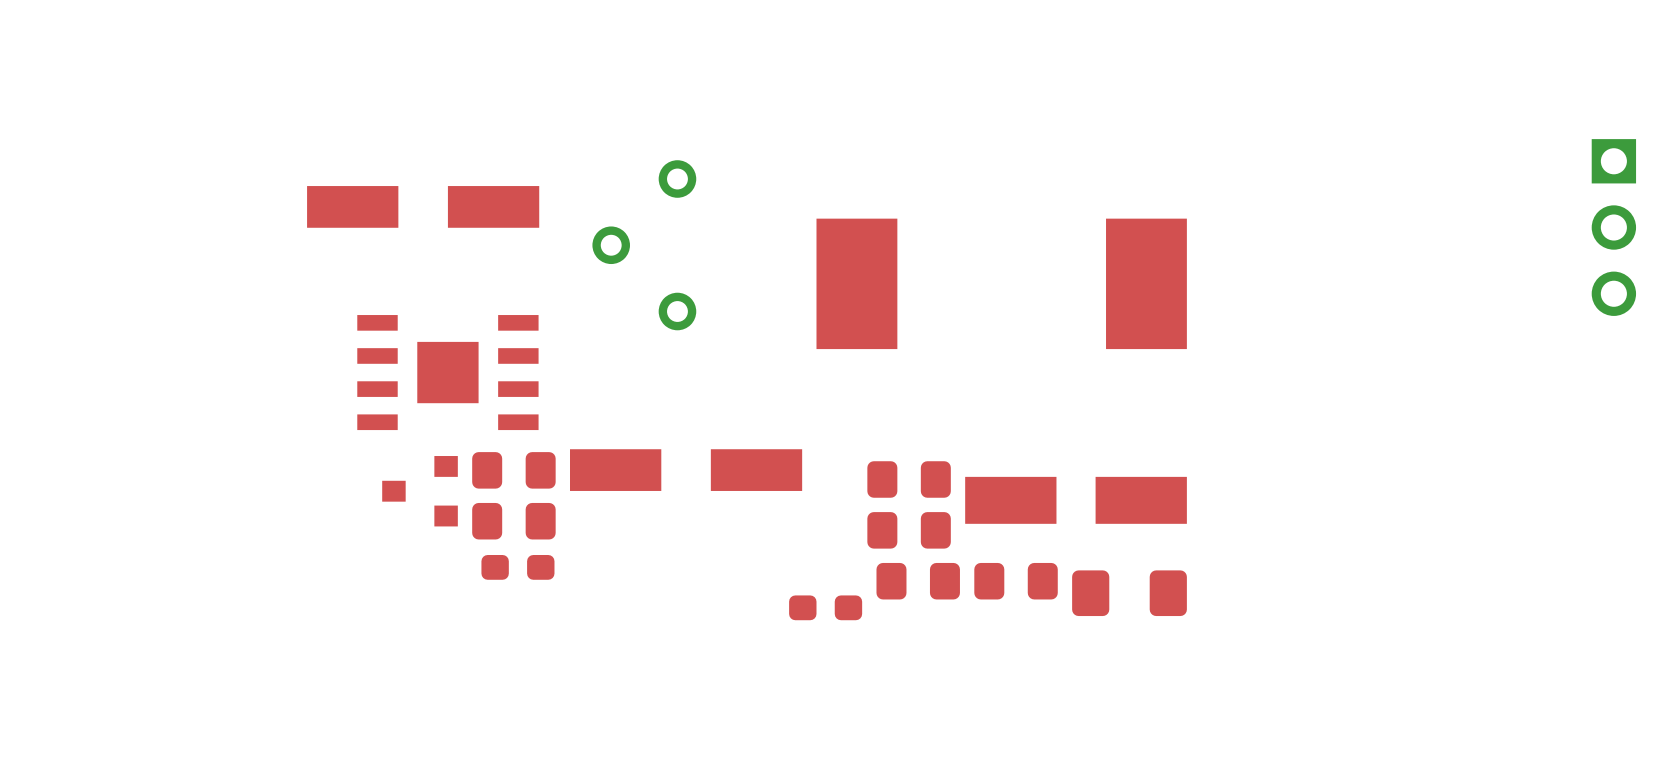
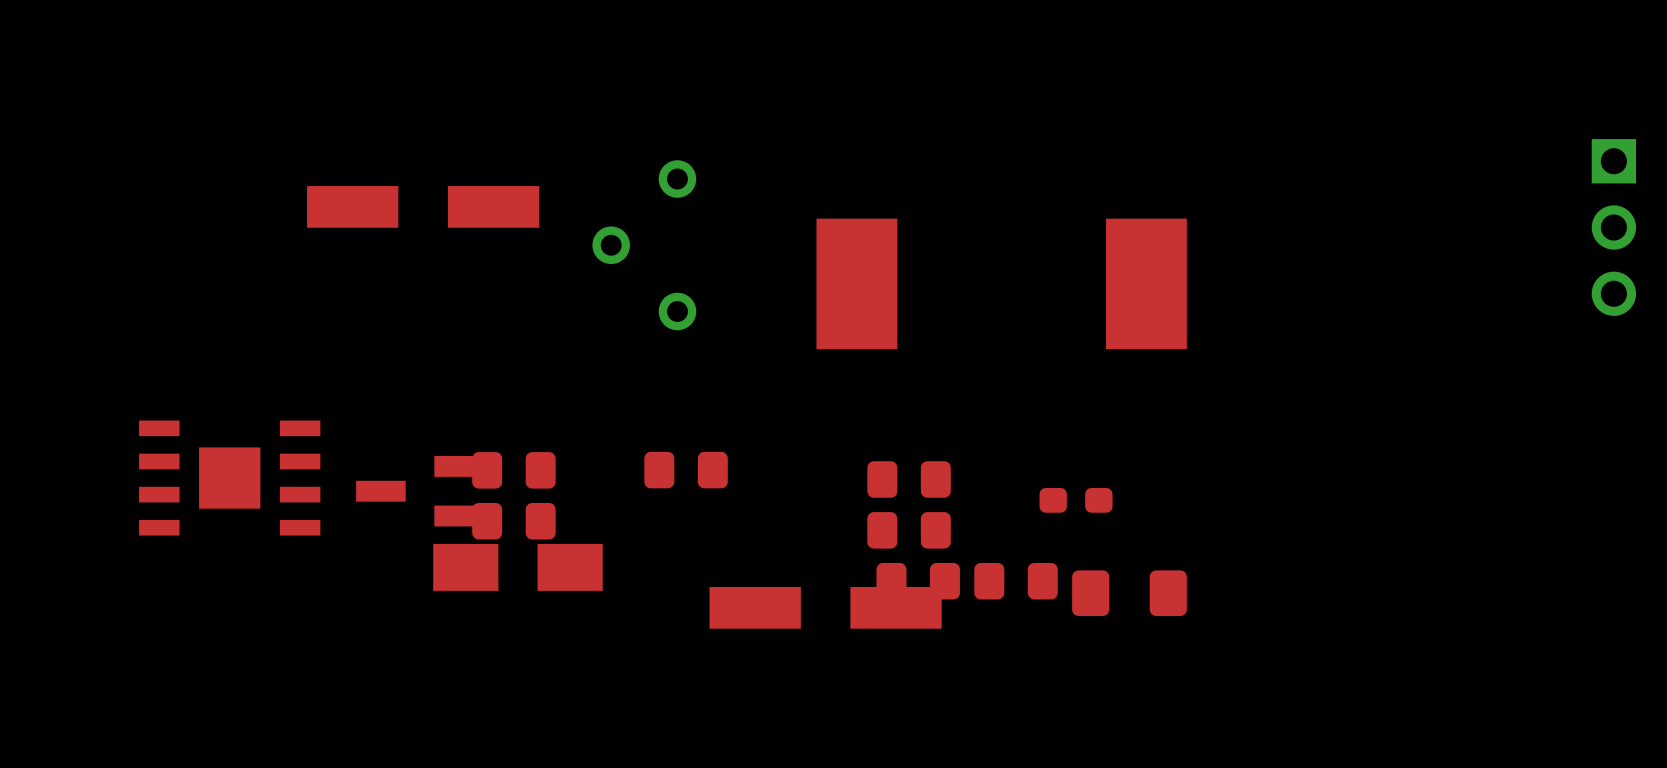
part position: (447, 372) -> (229, 478)
part footprint: [570, 449, 803, 491] -> [644, 451, 728, 489]
part footprint: [382, 456, 458, 527] -> [356, 456, 484, 527]
part footprint: [965, 476, 1187, 524] -> [1039, 487, 1113, 513]
part footprint: [481, 555, 555, 580] -> [433, 543, 603, 591]
part footprint: [789, 595, 863, 621] -> [709, 586, 942, 629]

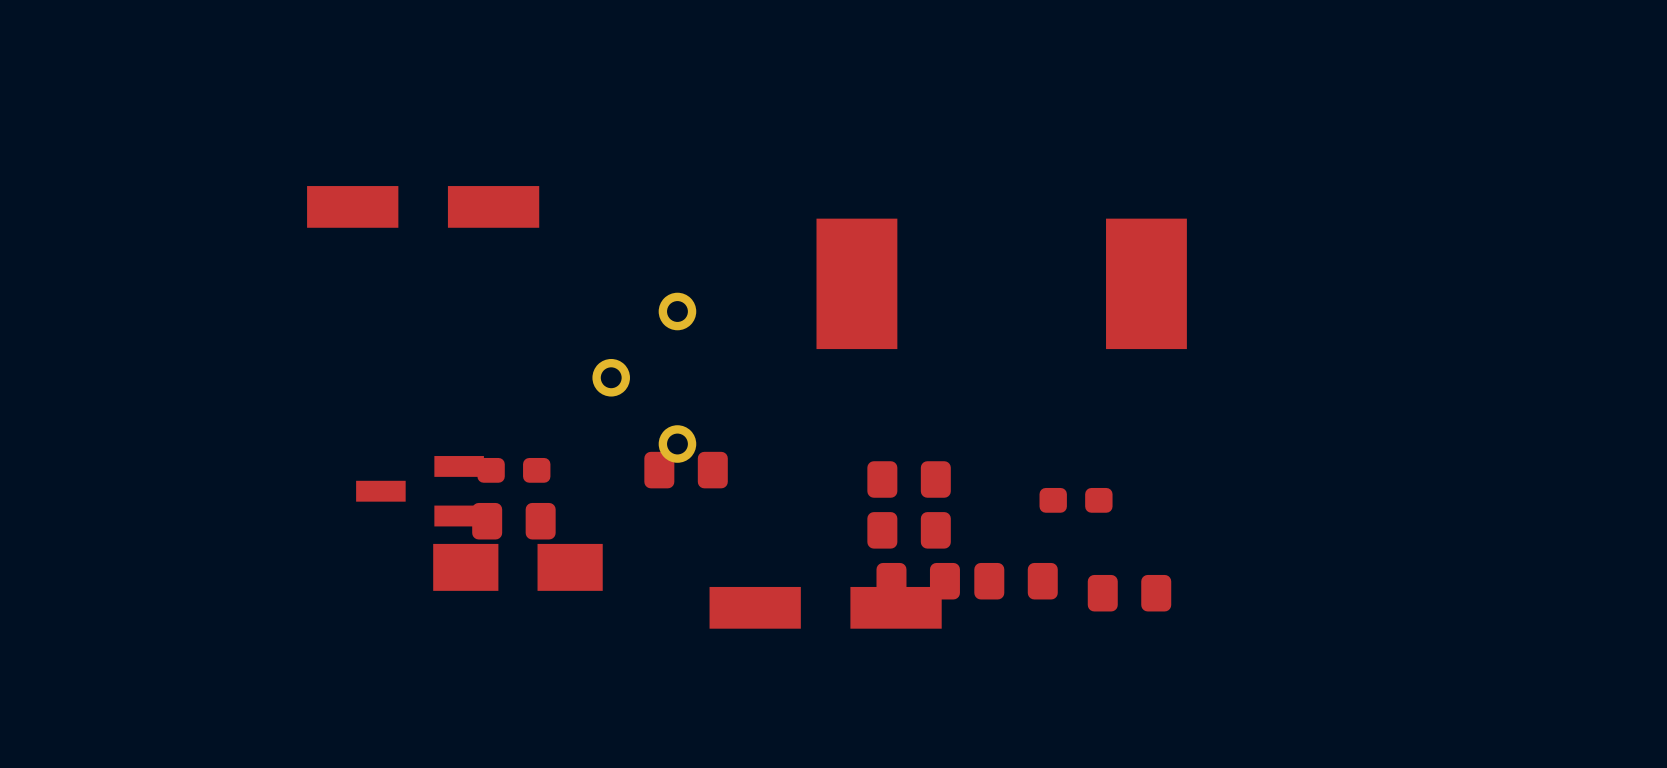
part: (1613, 227) -> none
part position: (644, 245) -> (644, 377)
part footprint: [472, 452, 556, 489] -> [477, 457, 551, 483]
part: (229, 478) -> none
part footprint: [1072, 570, 1187, 617] -> [1087, 574, 1172, 612]

